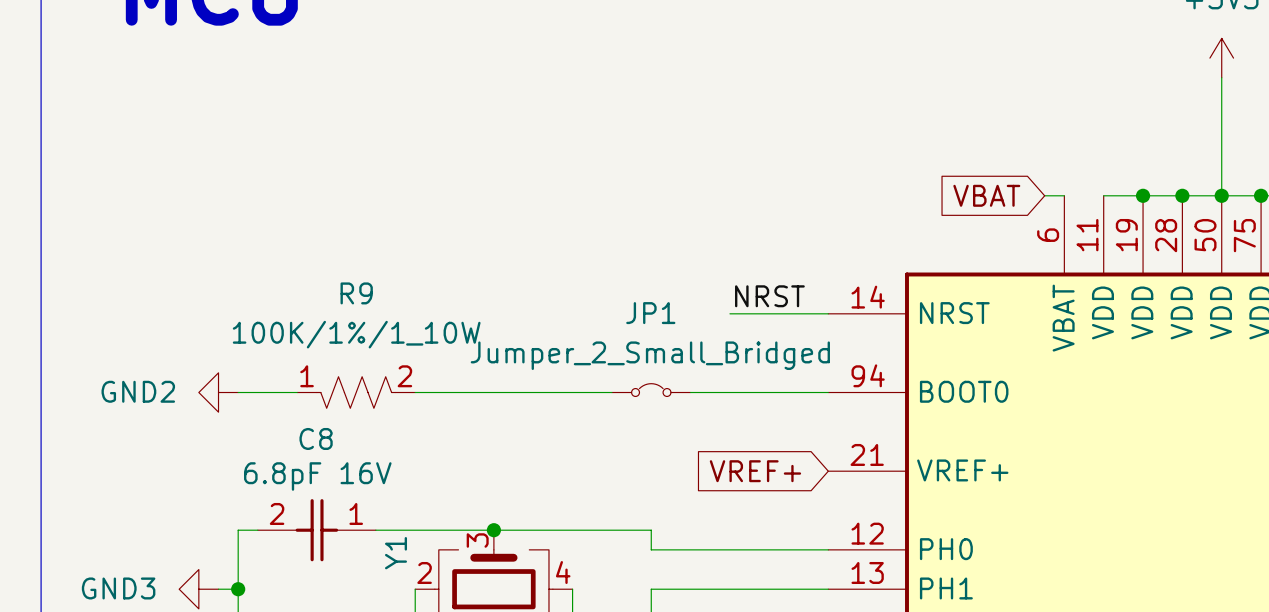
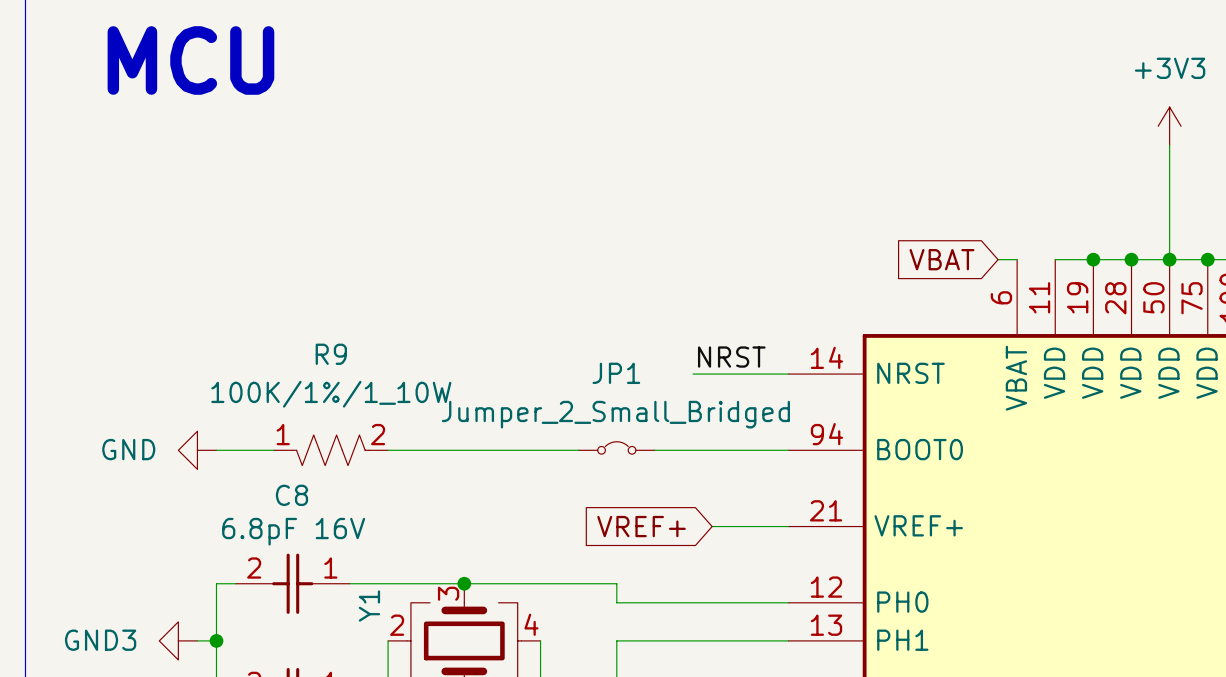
power symbol: GND2 (218, 392) -> GND (197, 450)
wire: none -> (712, 526) (788, 526)
global label position: VREF+ (755, 471) -> VREF+ (641, 526)

